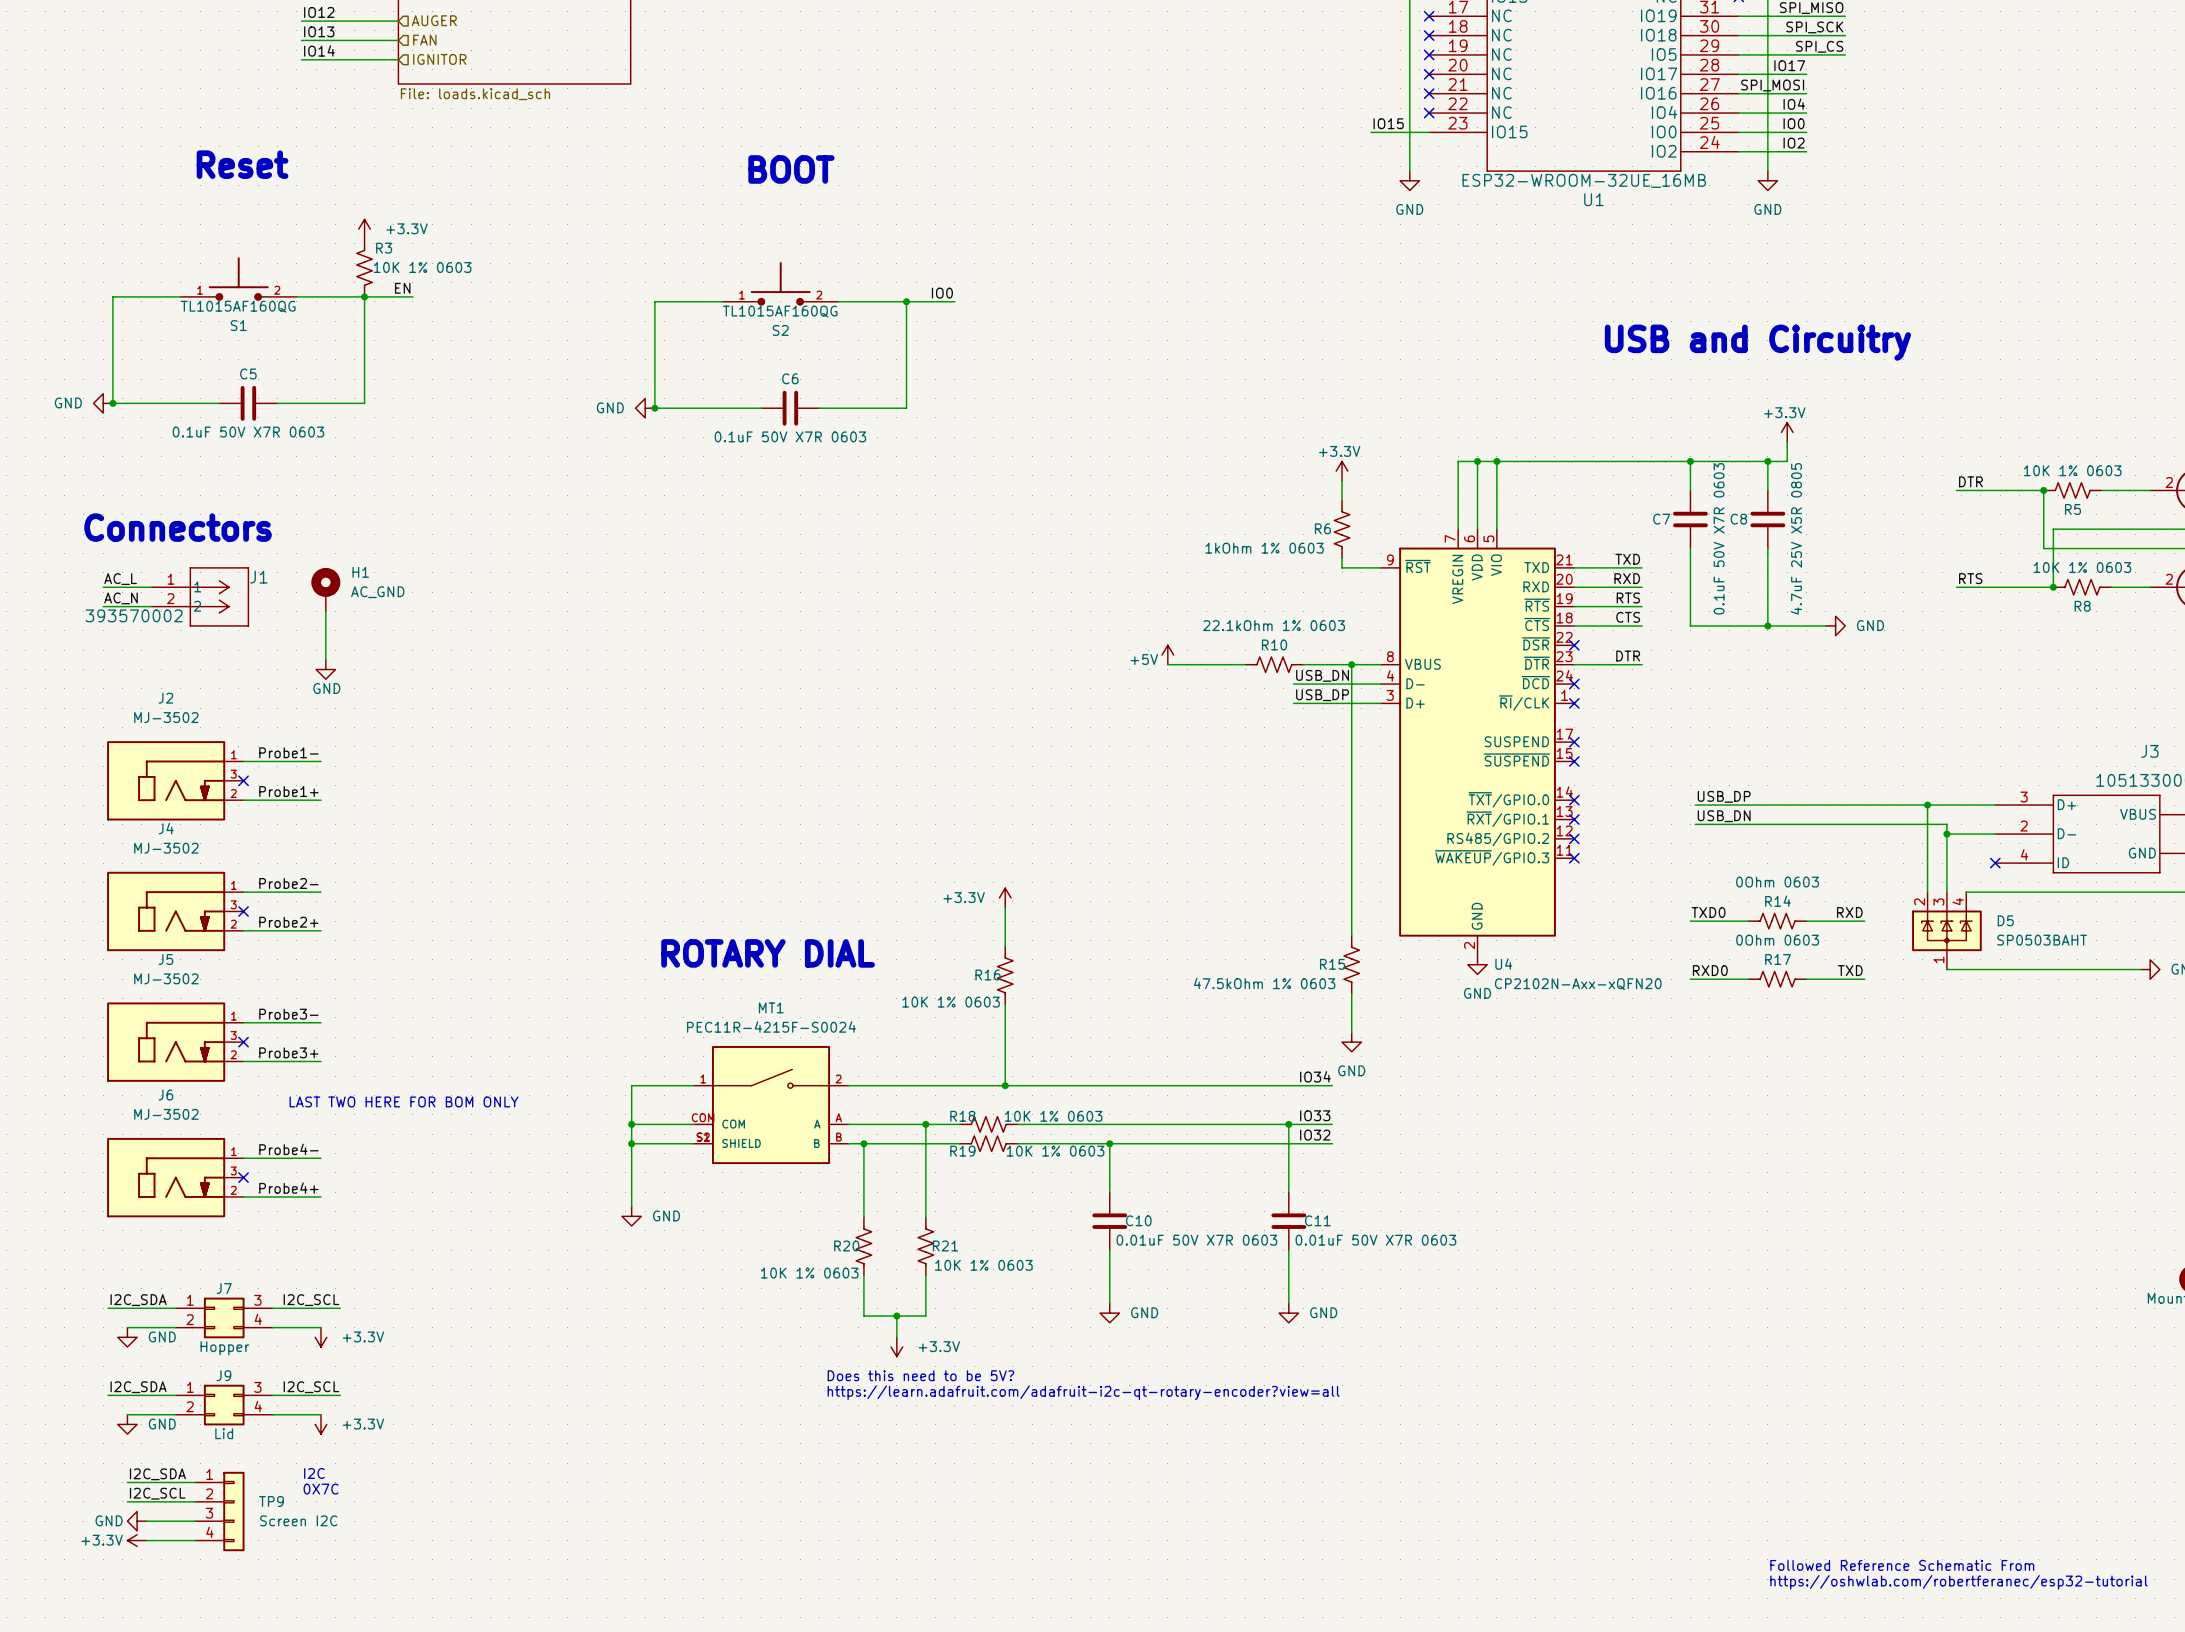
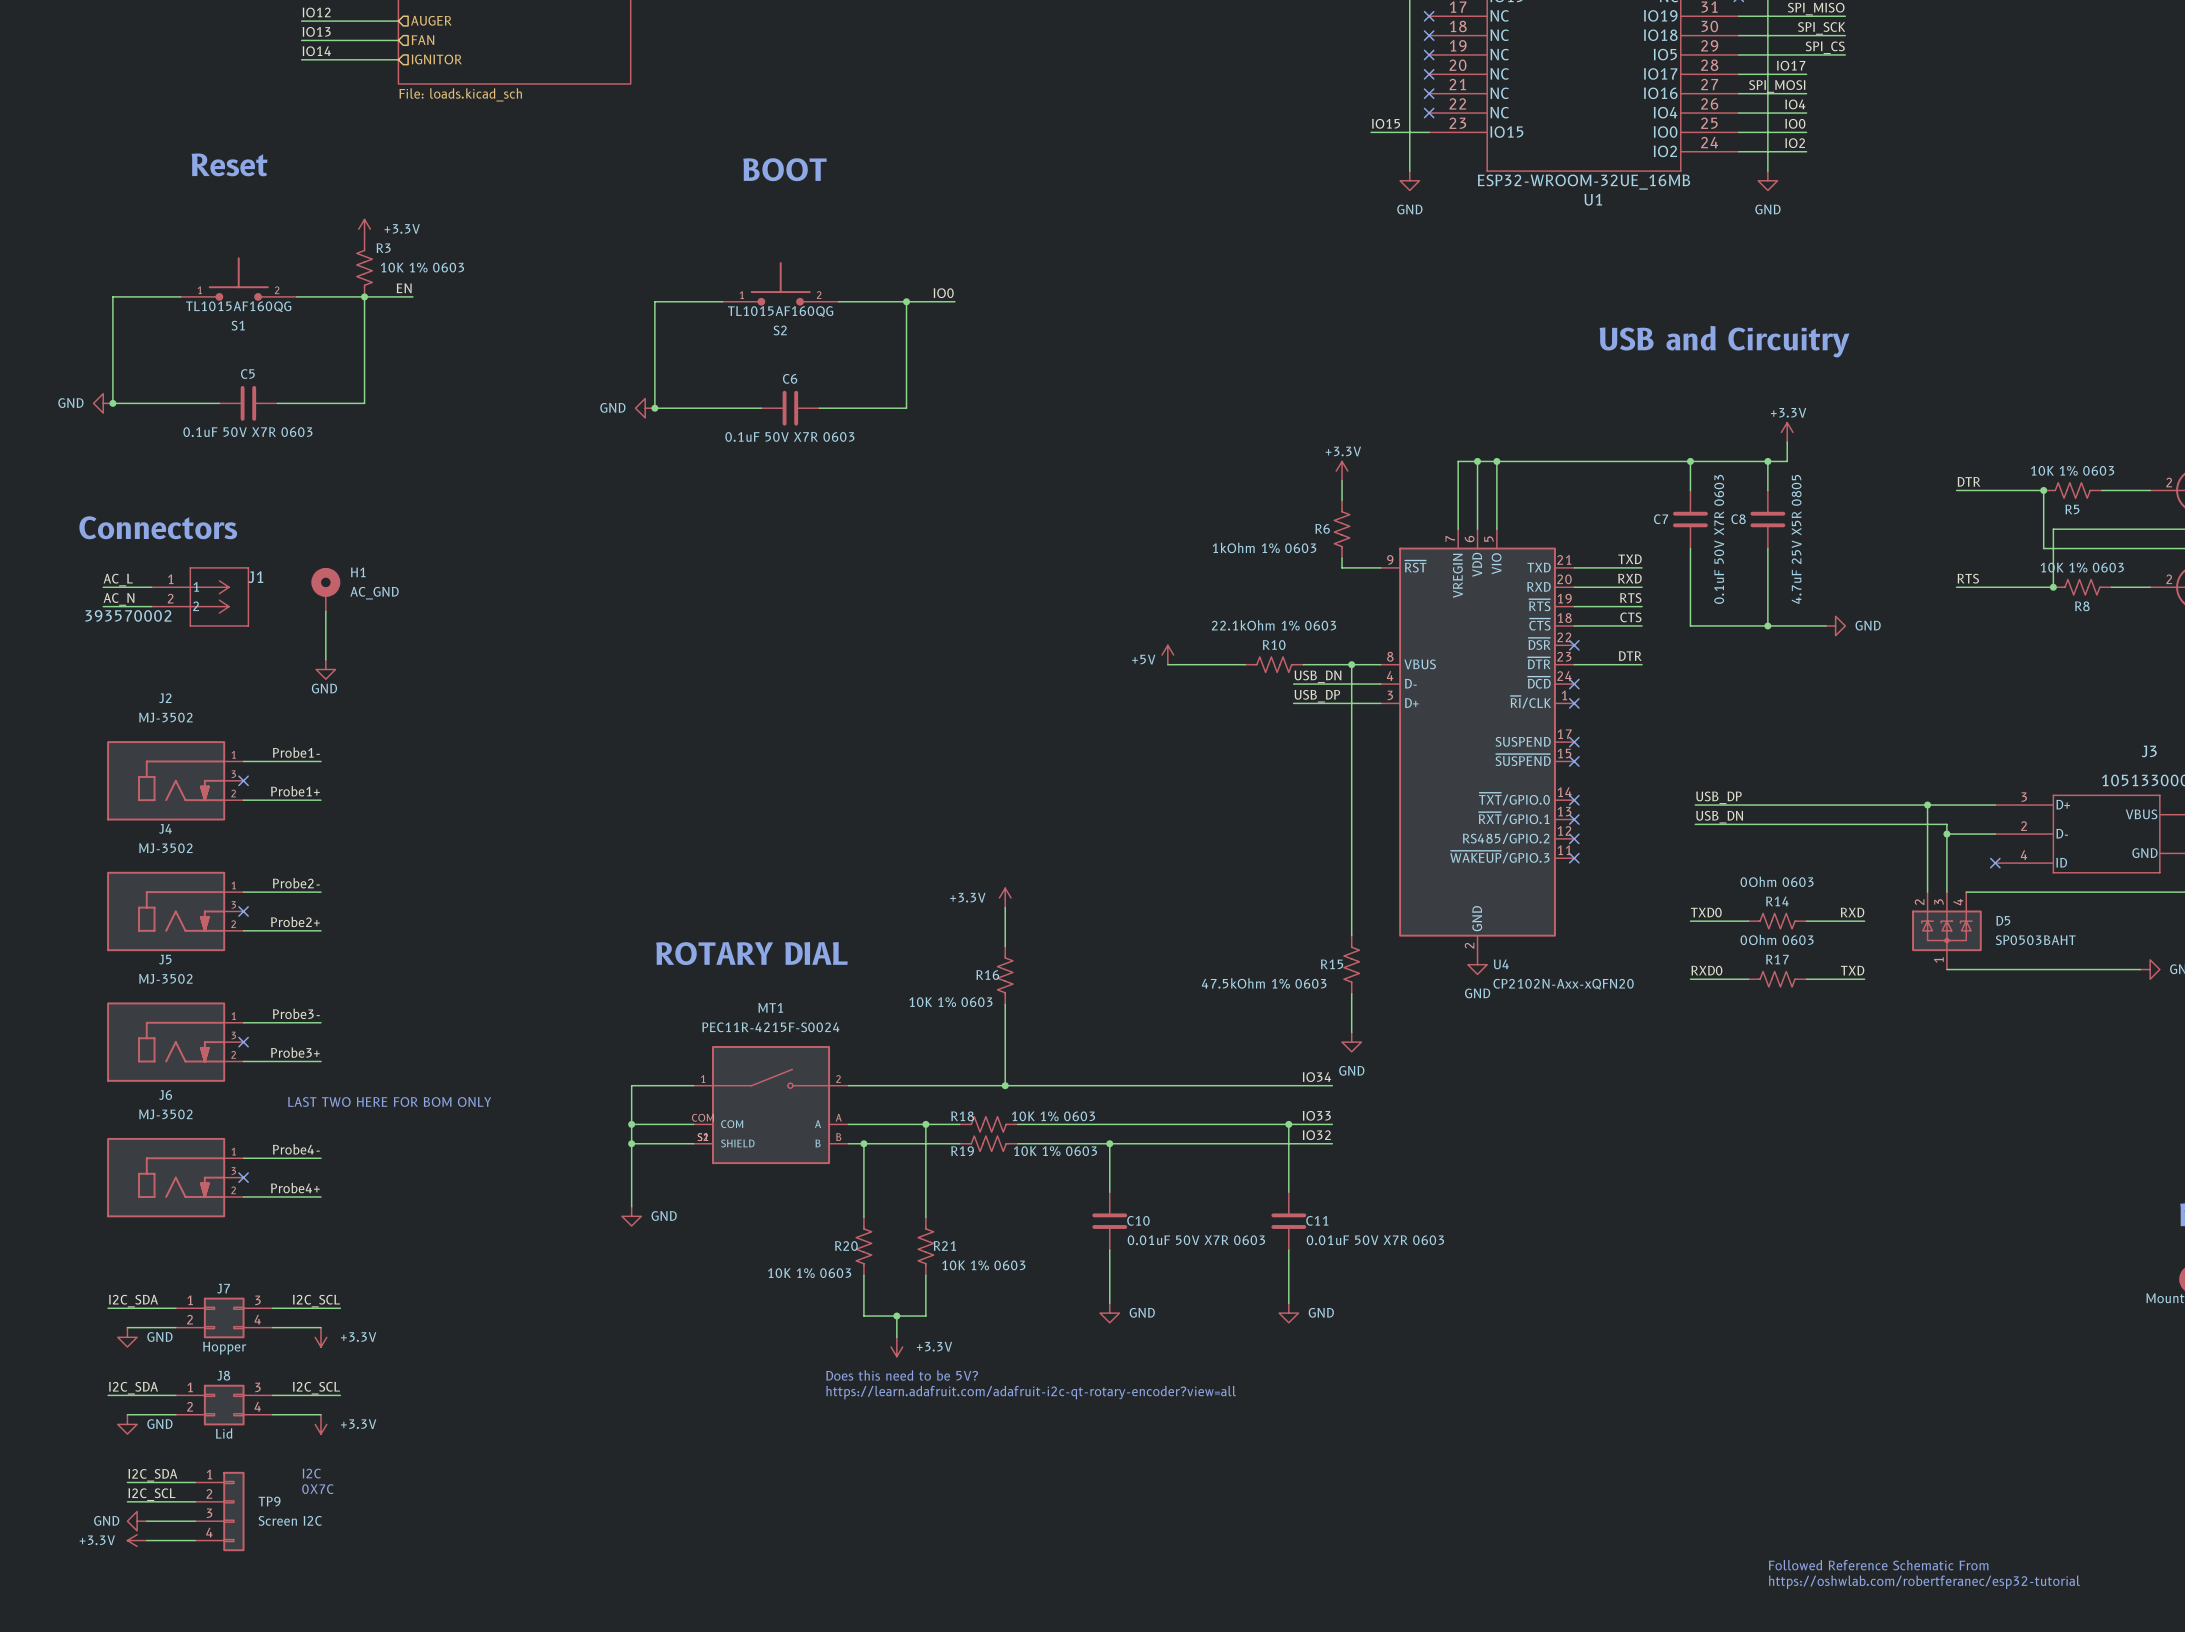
J9 name: J9 (223, 1375) -> J8 (223, 1375)

